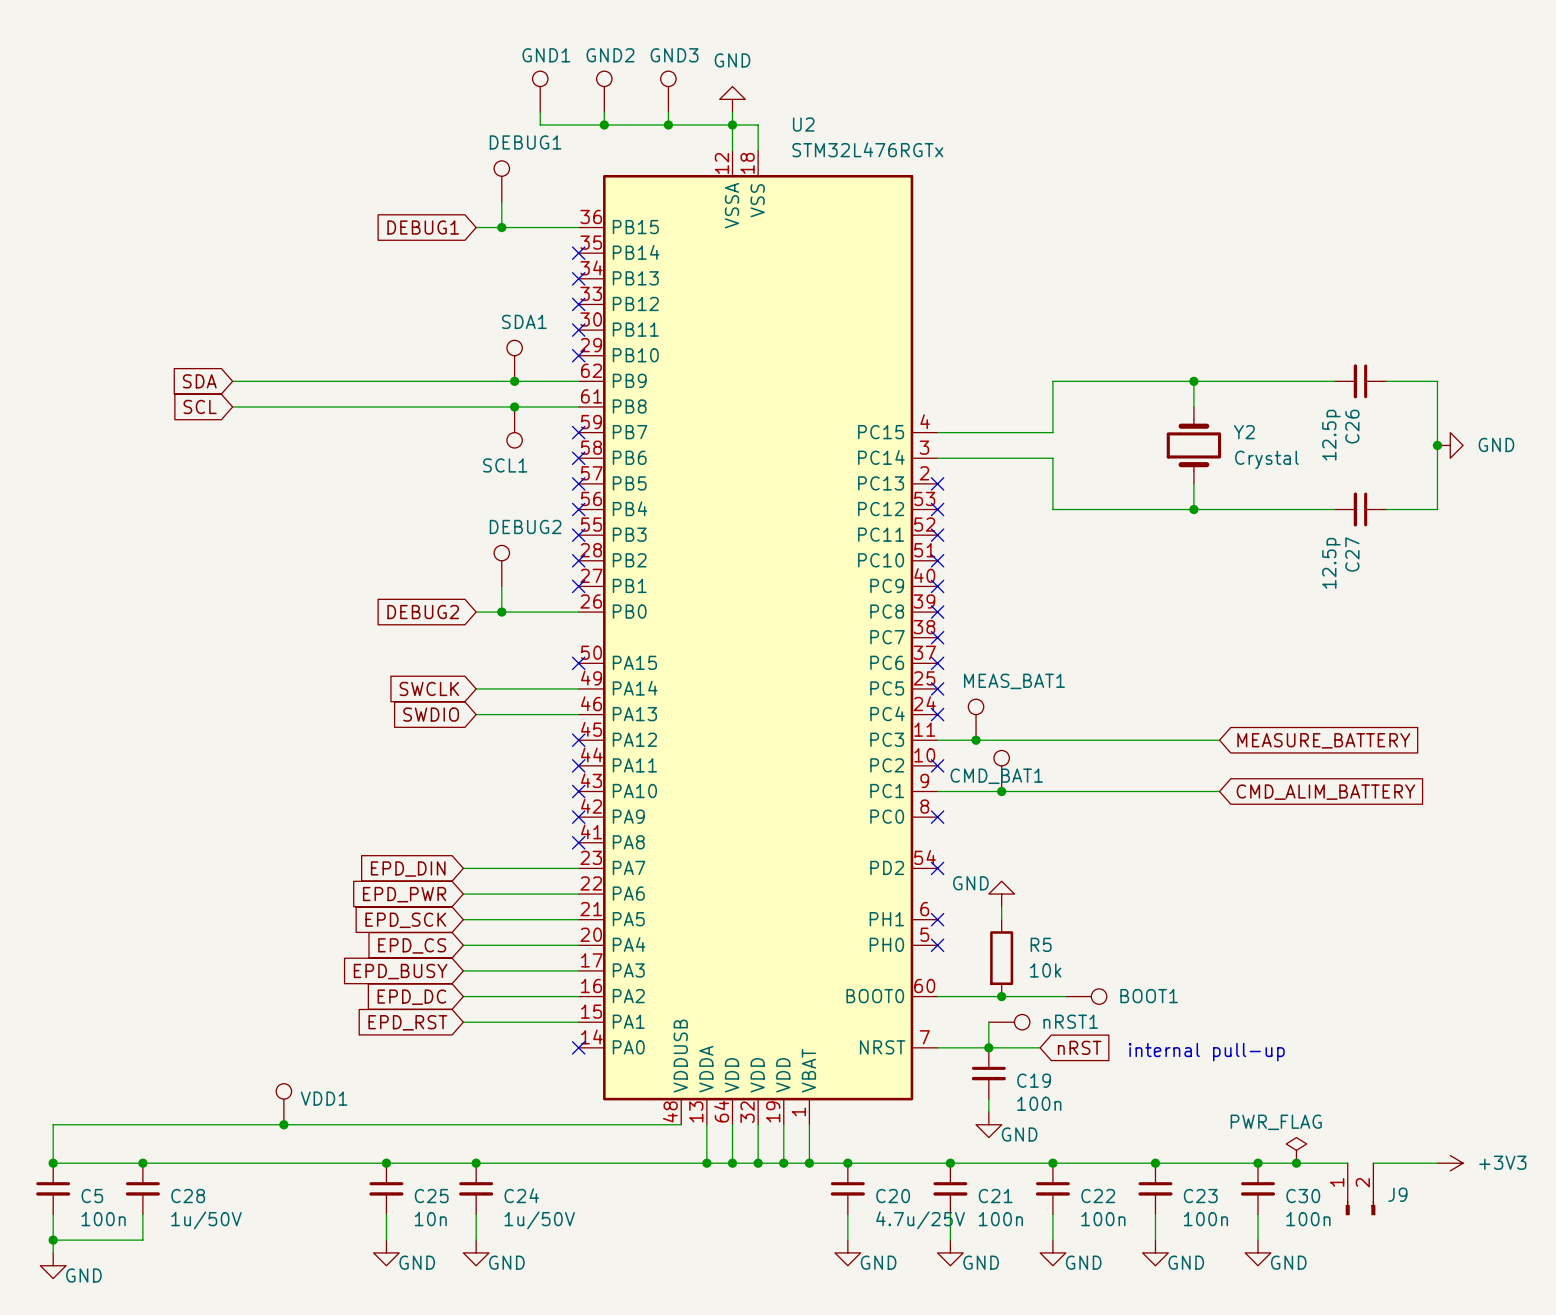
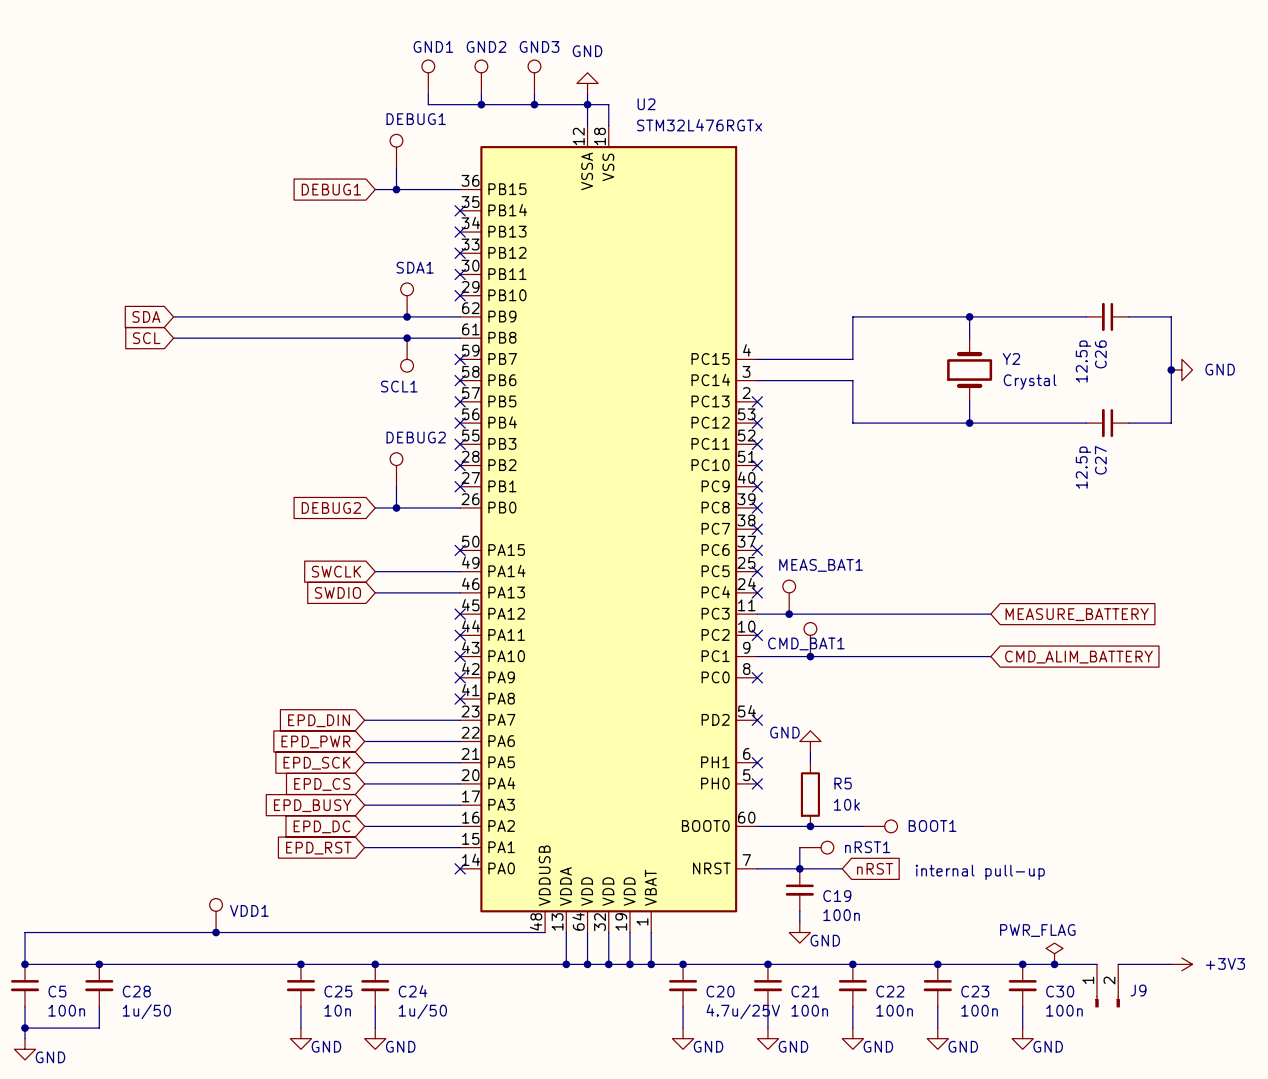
C28 value: 1u/50V (206, 1220) -> 1u/50 (146, 1011)
C24 value: 1u/50V (539, 1220) -> 1u/50 (422, 1011)

